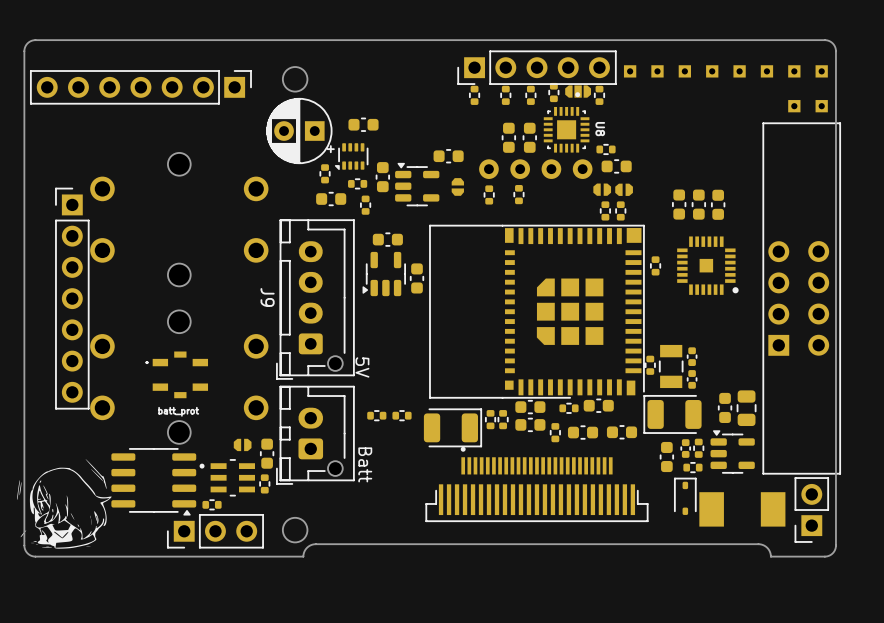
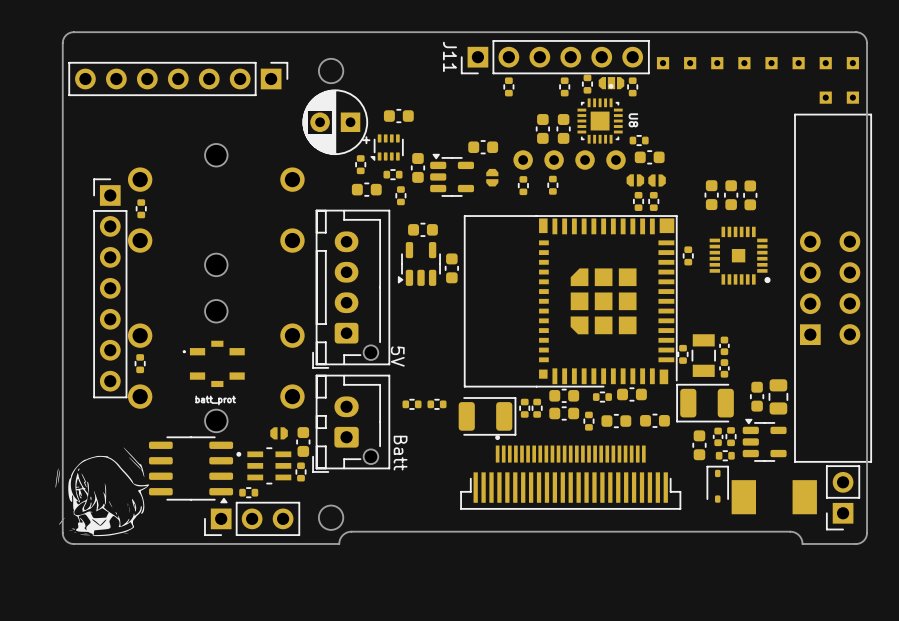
J11: none -> (555, 57)
part: (537, 67) -> none
part: (505, 95) -> none
part: none -> (141, 208)
J9 name: J9 (267, 297) -> none
part: none -> (140, 363)

